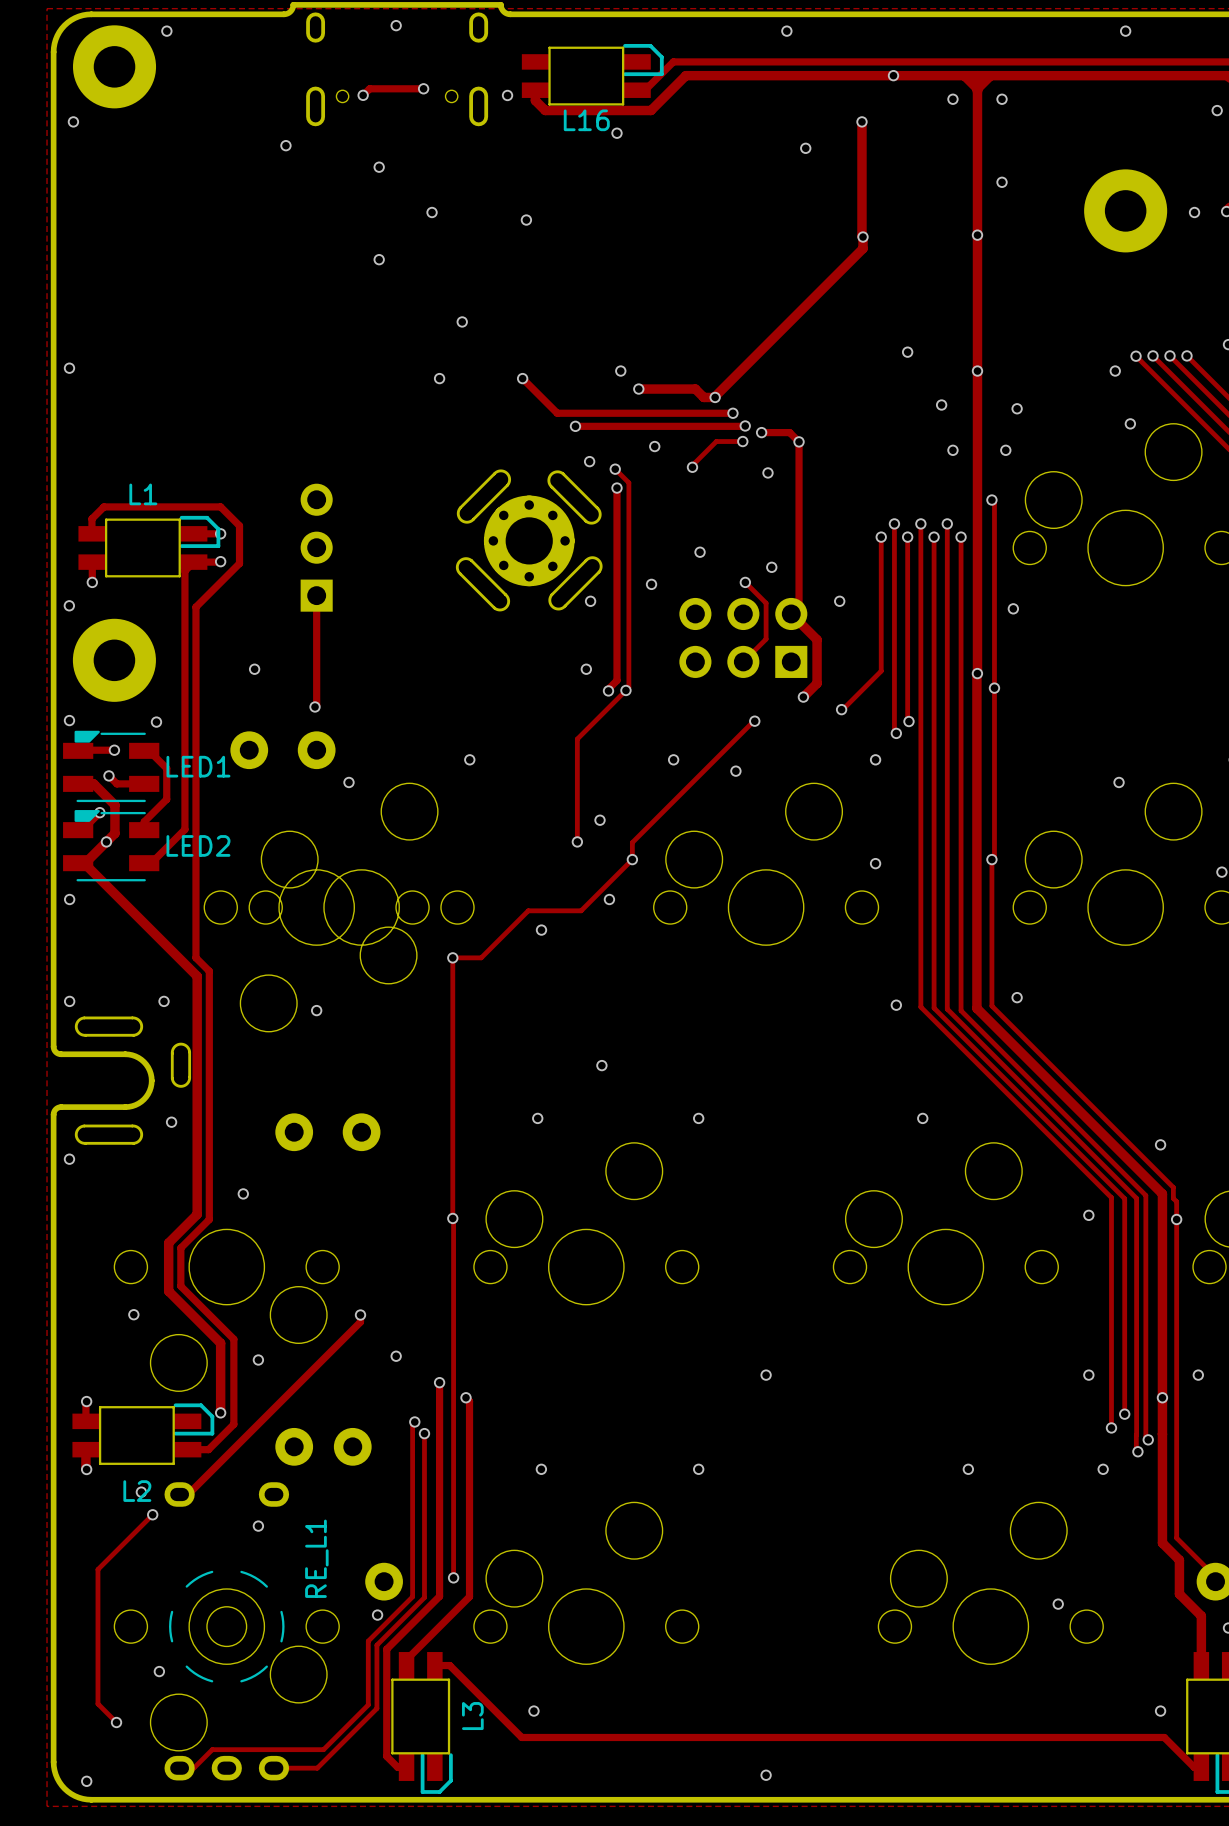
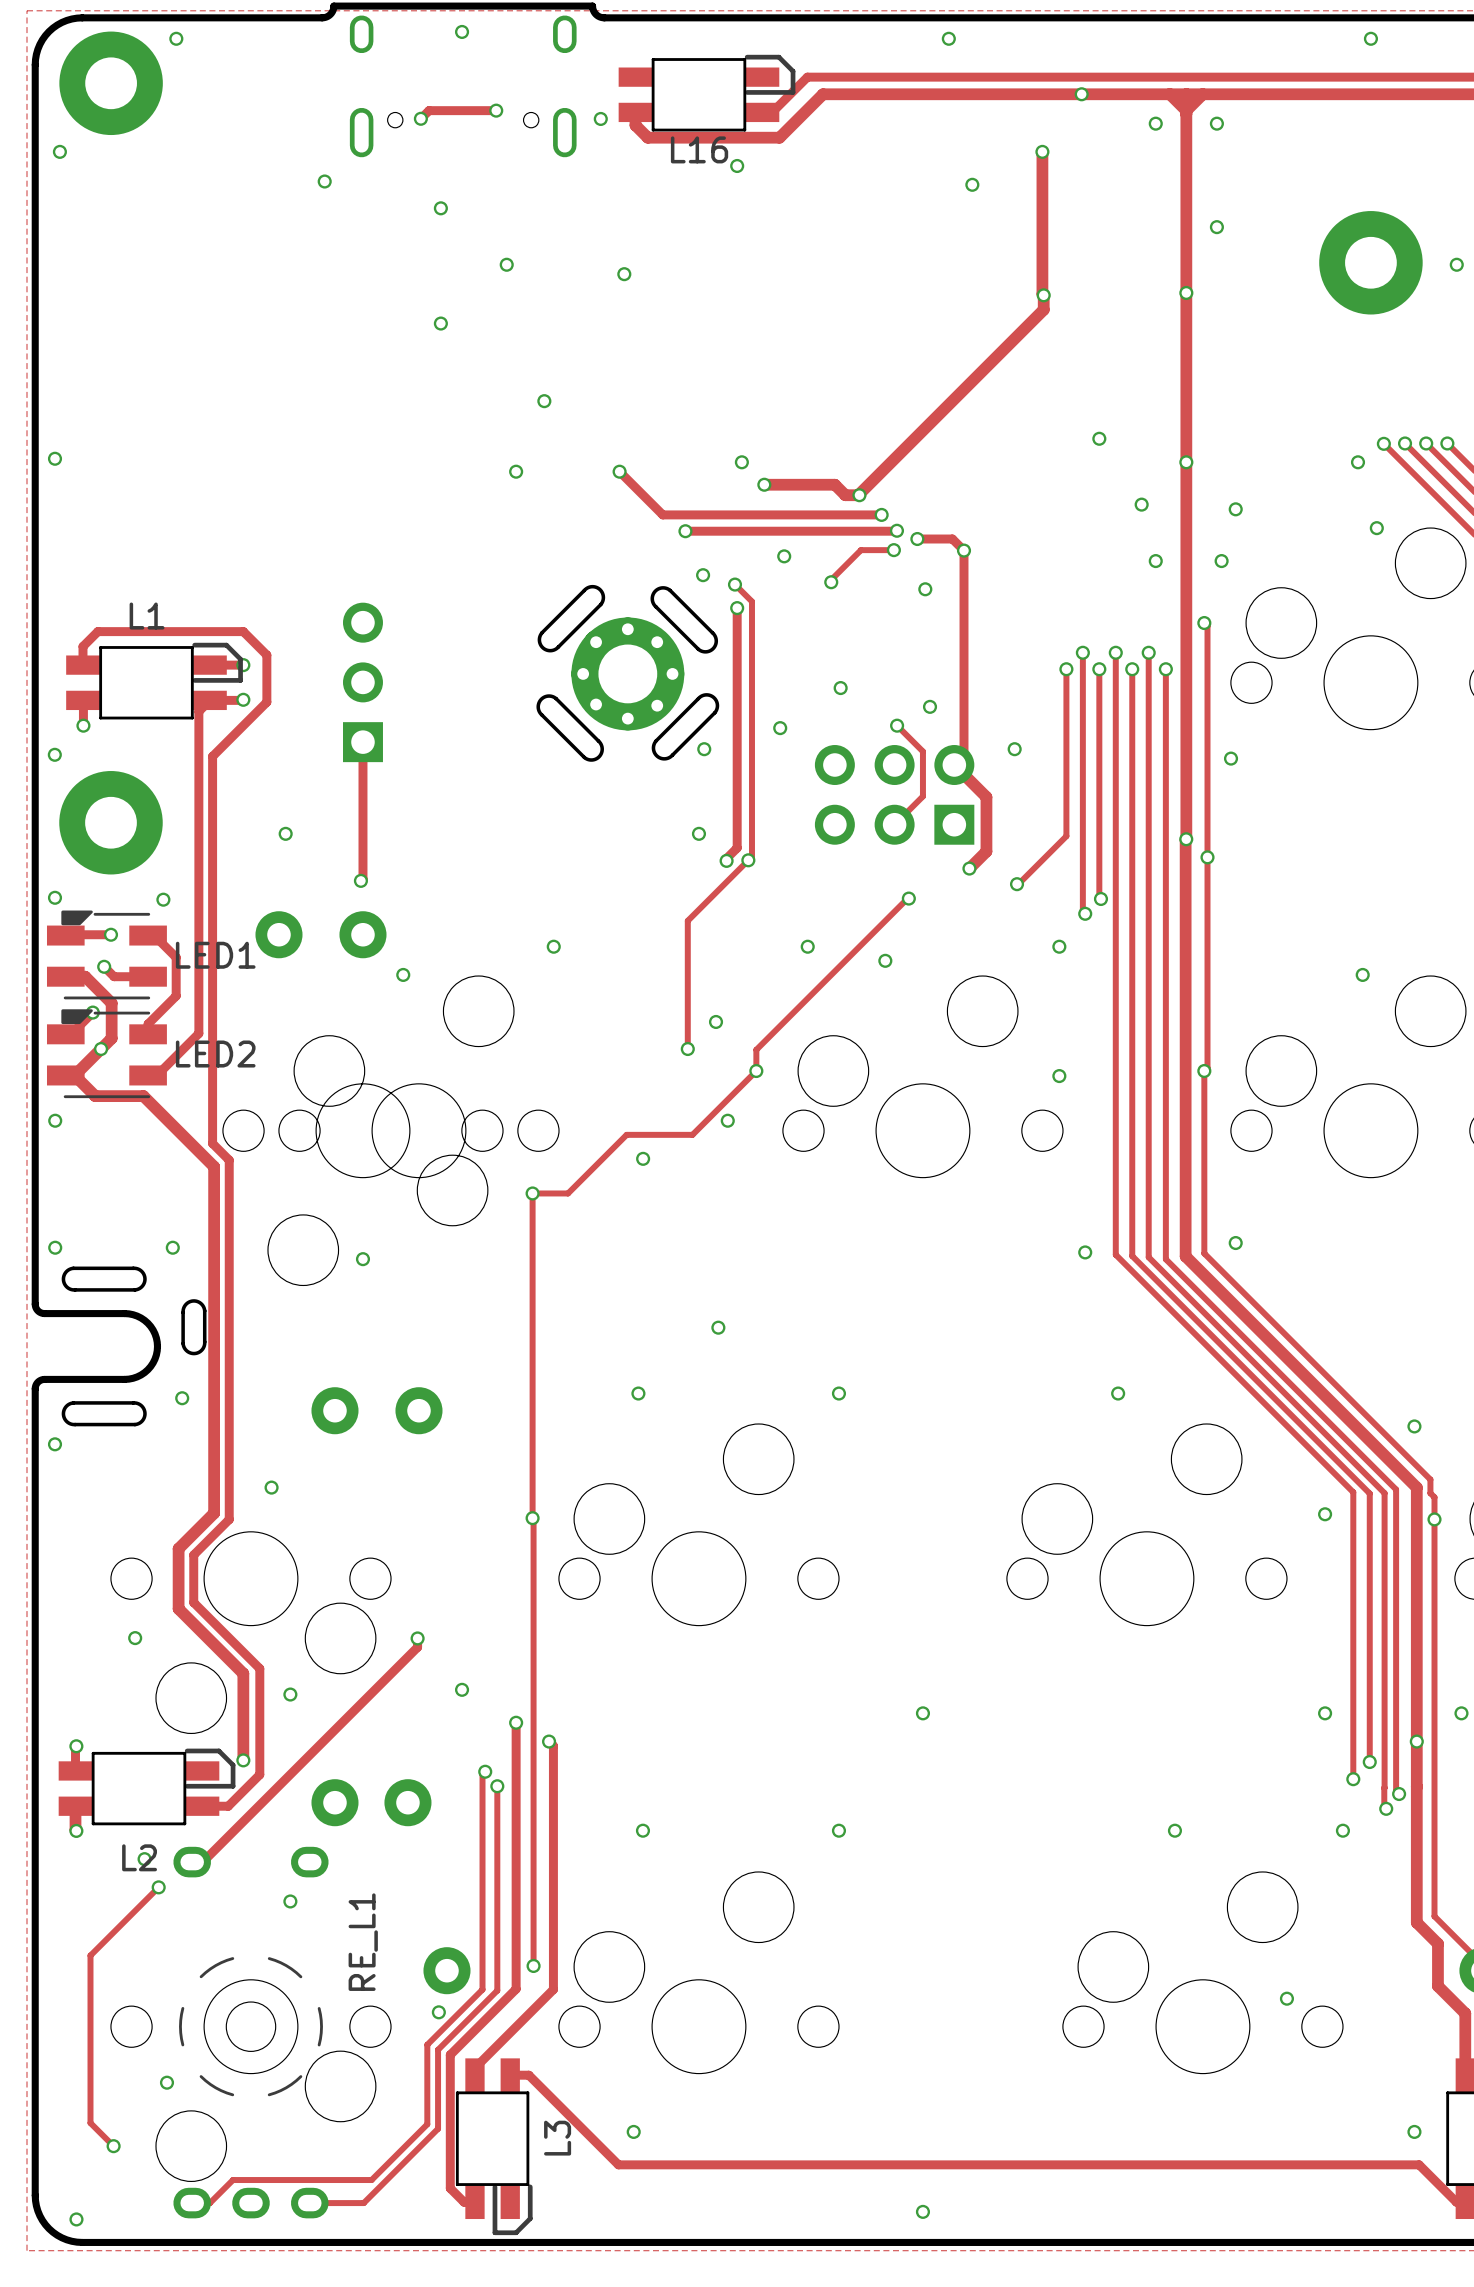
track: (85, 863) (197, 976) -> (74, 1075) (95, 1096) (143, 1096) (214, 1166) (214, 1216)
track: (195, 917) (195, 957) (209, 971) -> (212, 1143) (229, 1160) (229, 1210)

